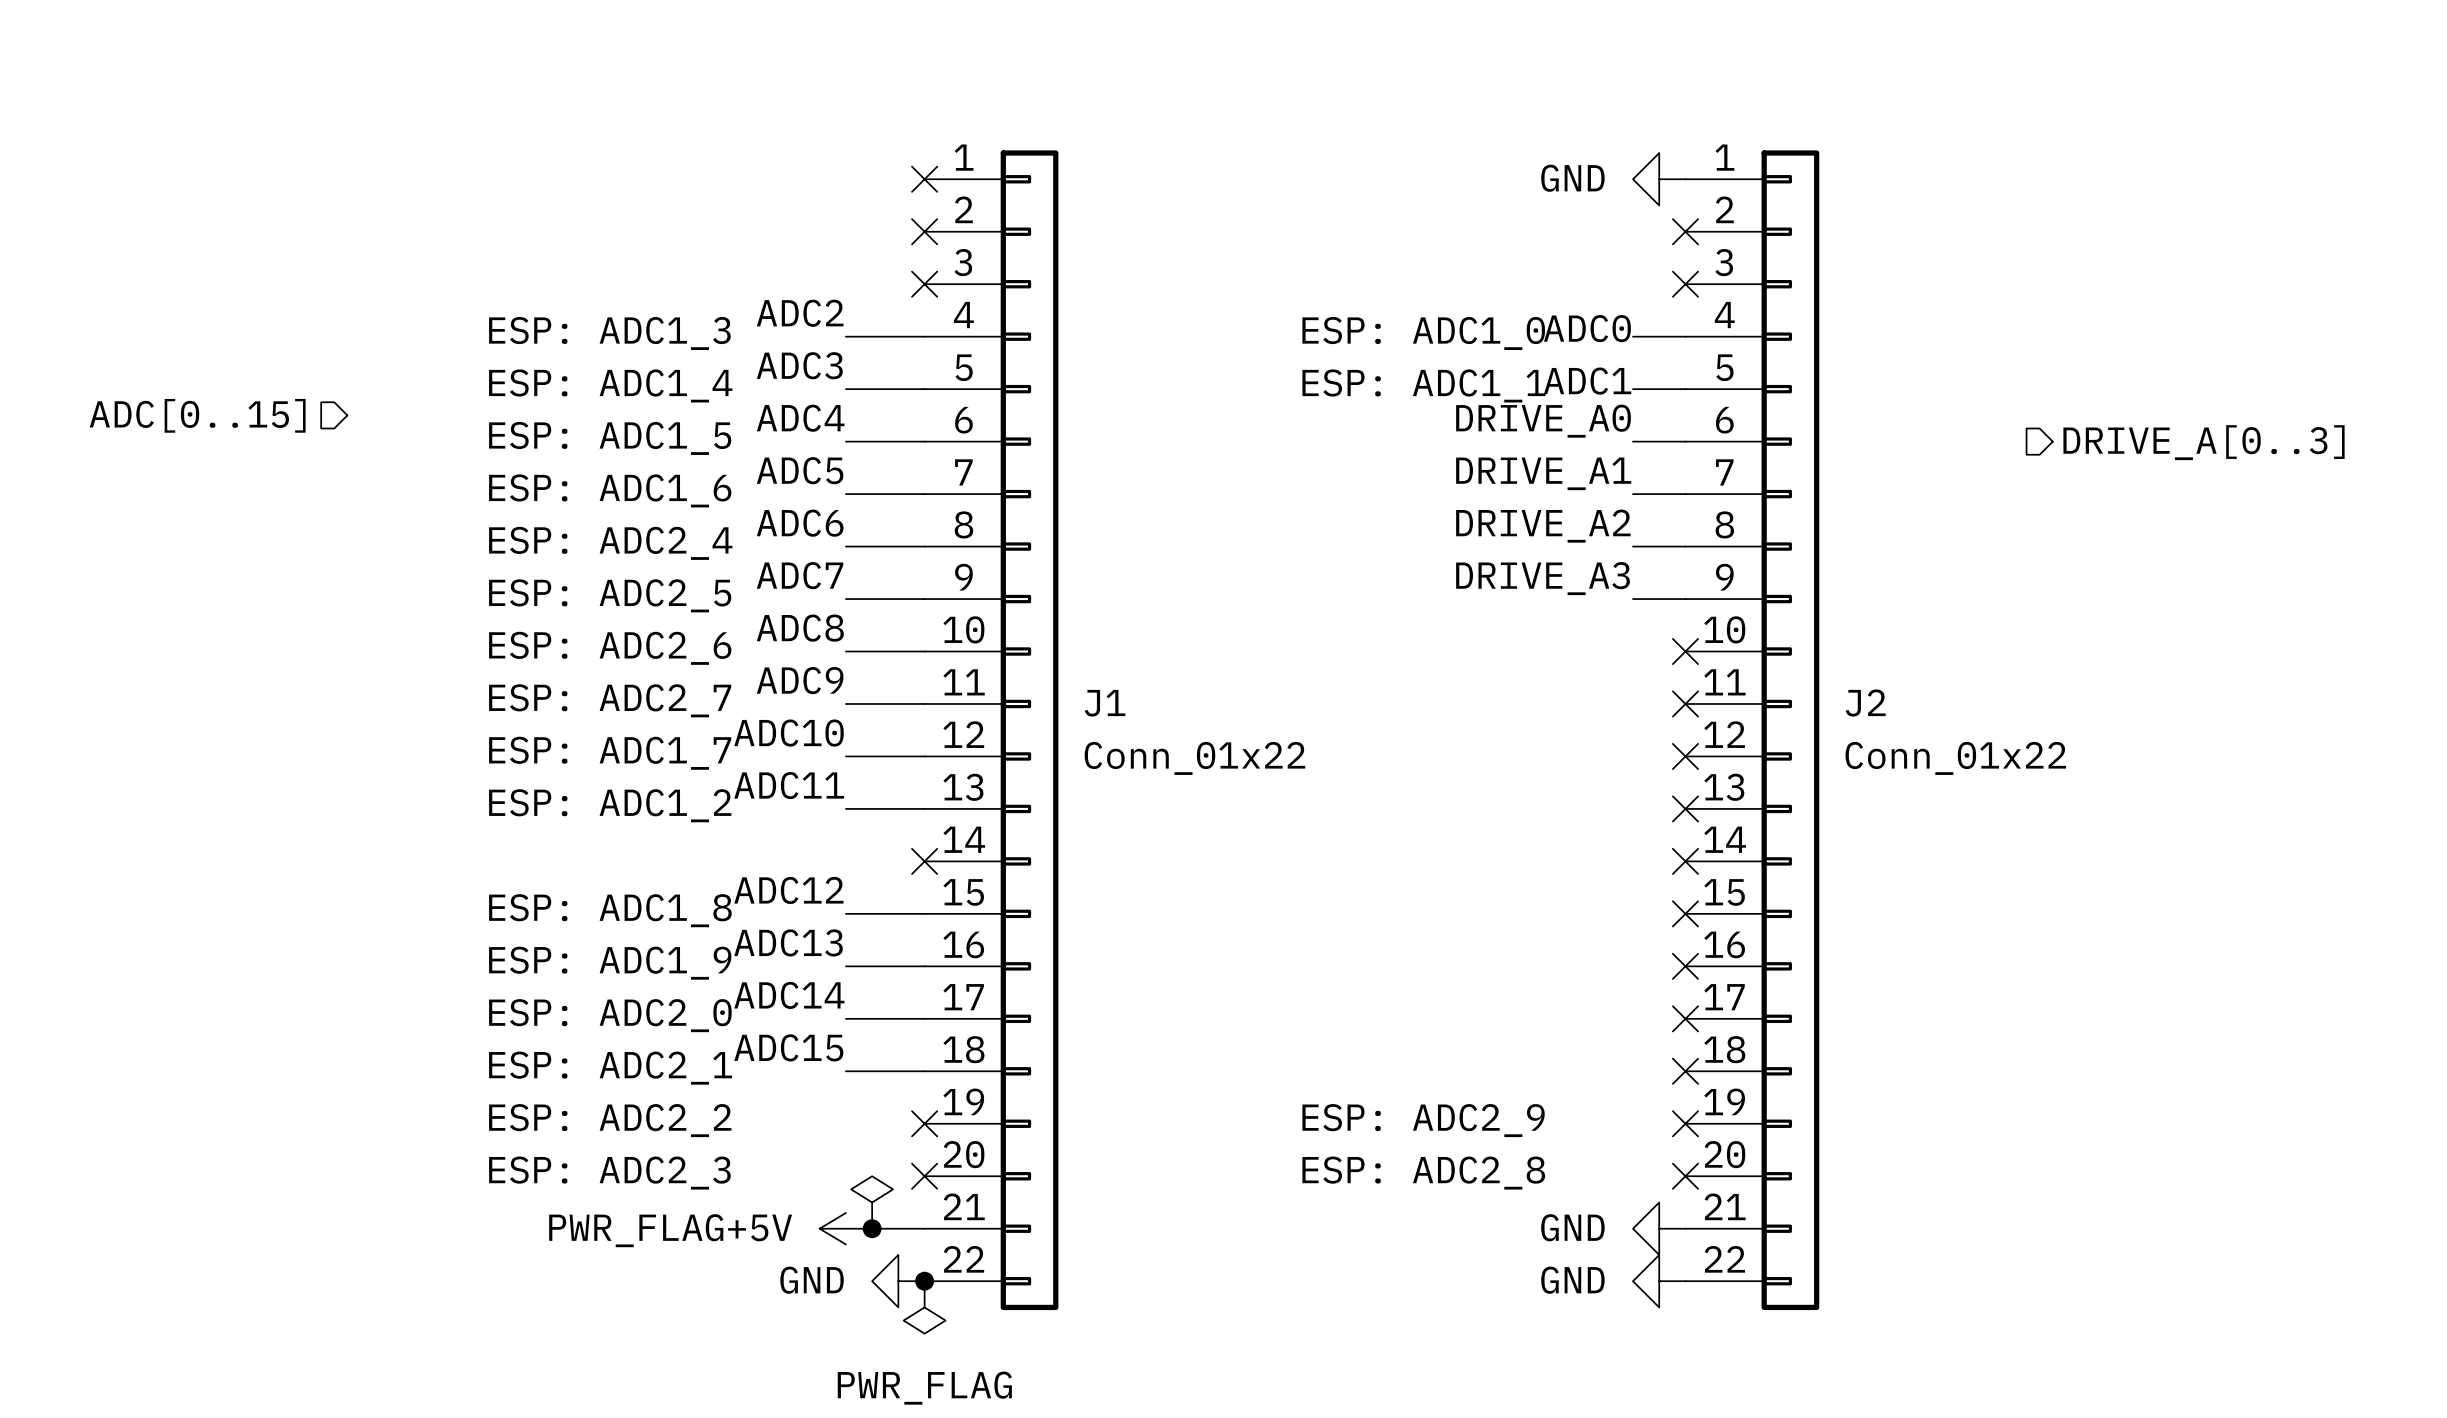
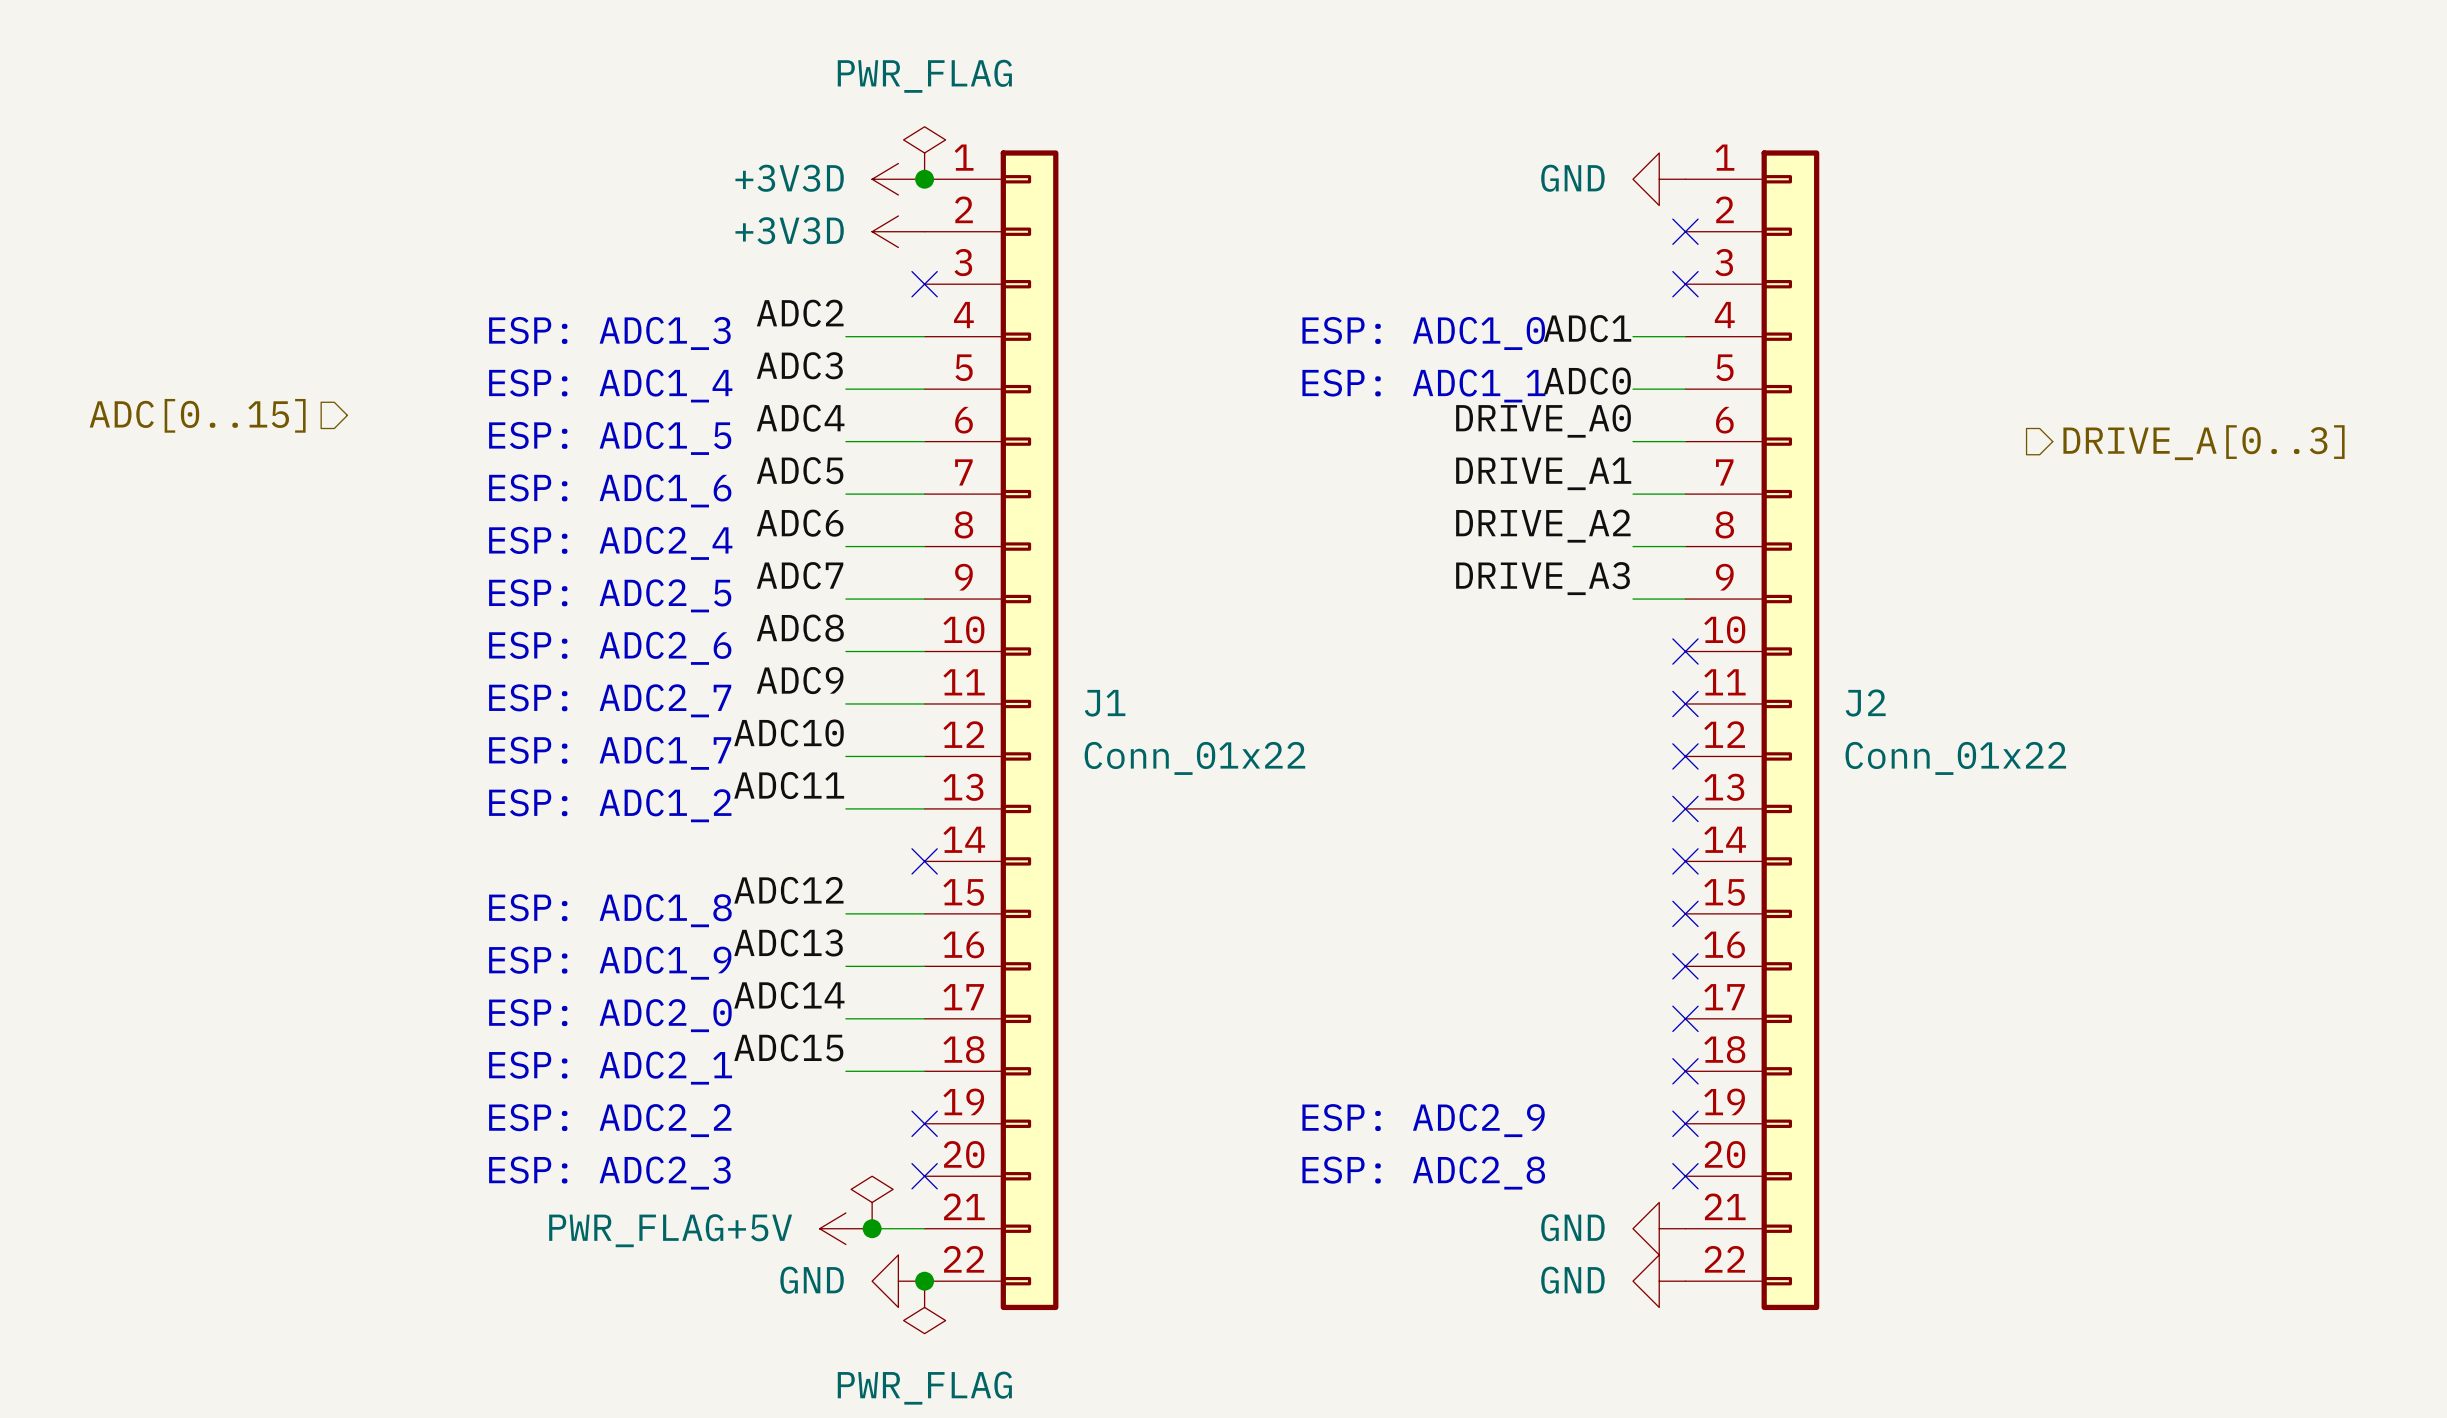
power symbol: none -> PWR_FLAG (924, 153)
power symbol: none -> +3V3D (898, 179)
no-connect mark: (924, 179) -> none
junction: none -> (924, 179)
power symbol: none -> +3V3D (898, 231)
no-connect mark: (924, 231) -> none
label: ADC0 (1587, 328) -> ADC1 (1587, 328)
label: ADC1 (1587, 381) -> ADC0 (1587, 381)

